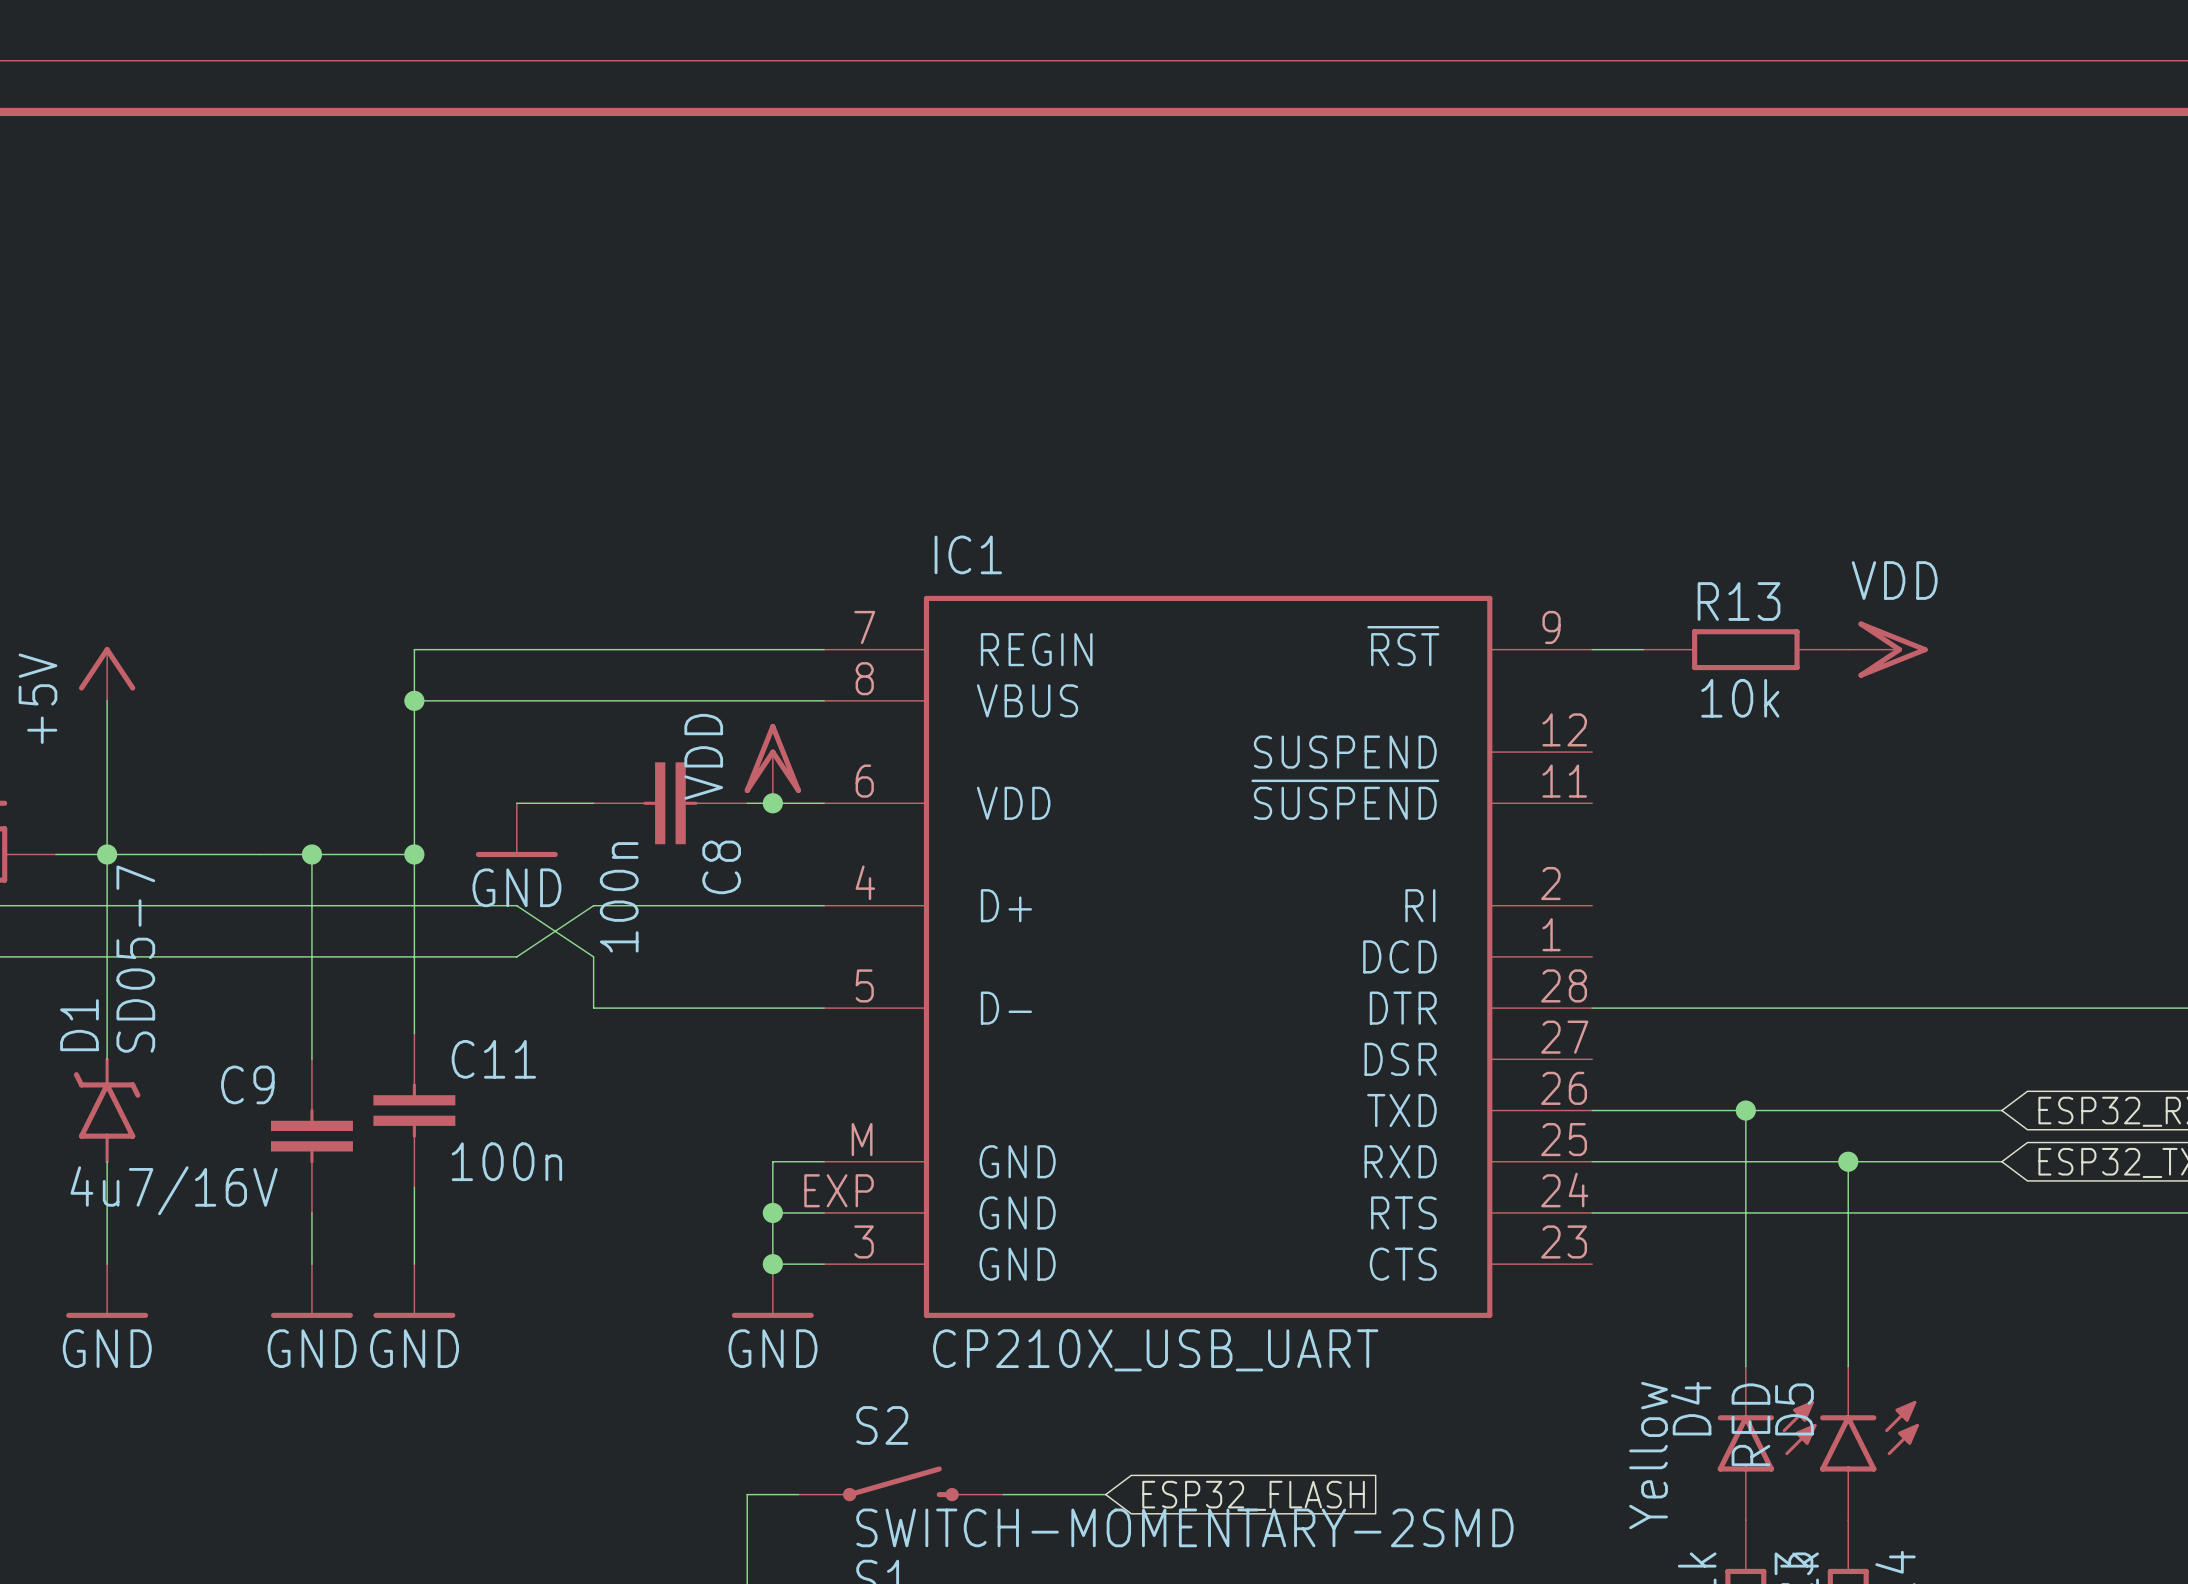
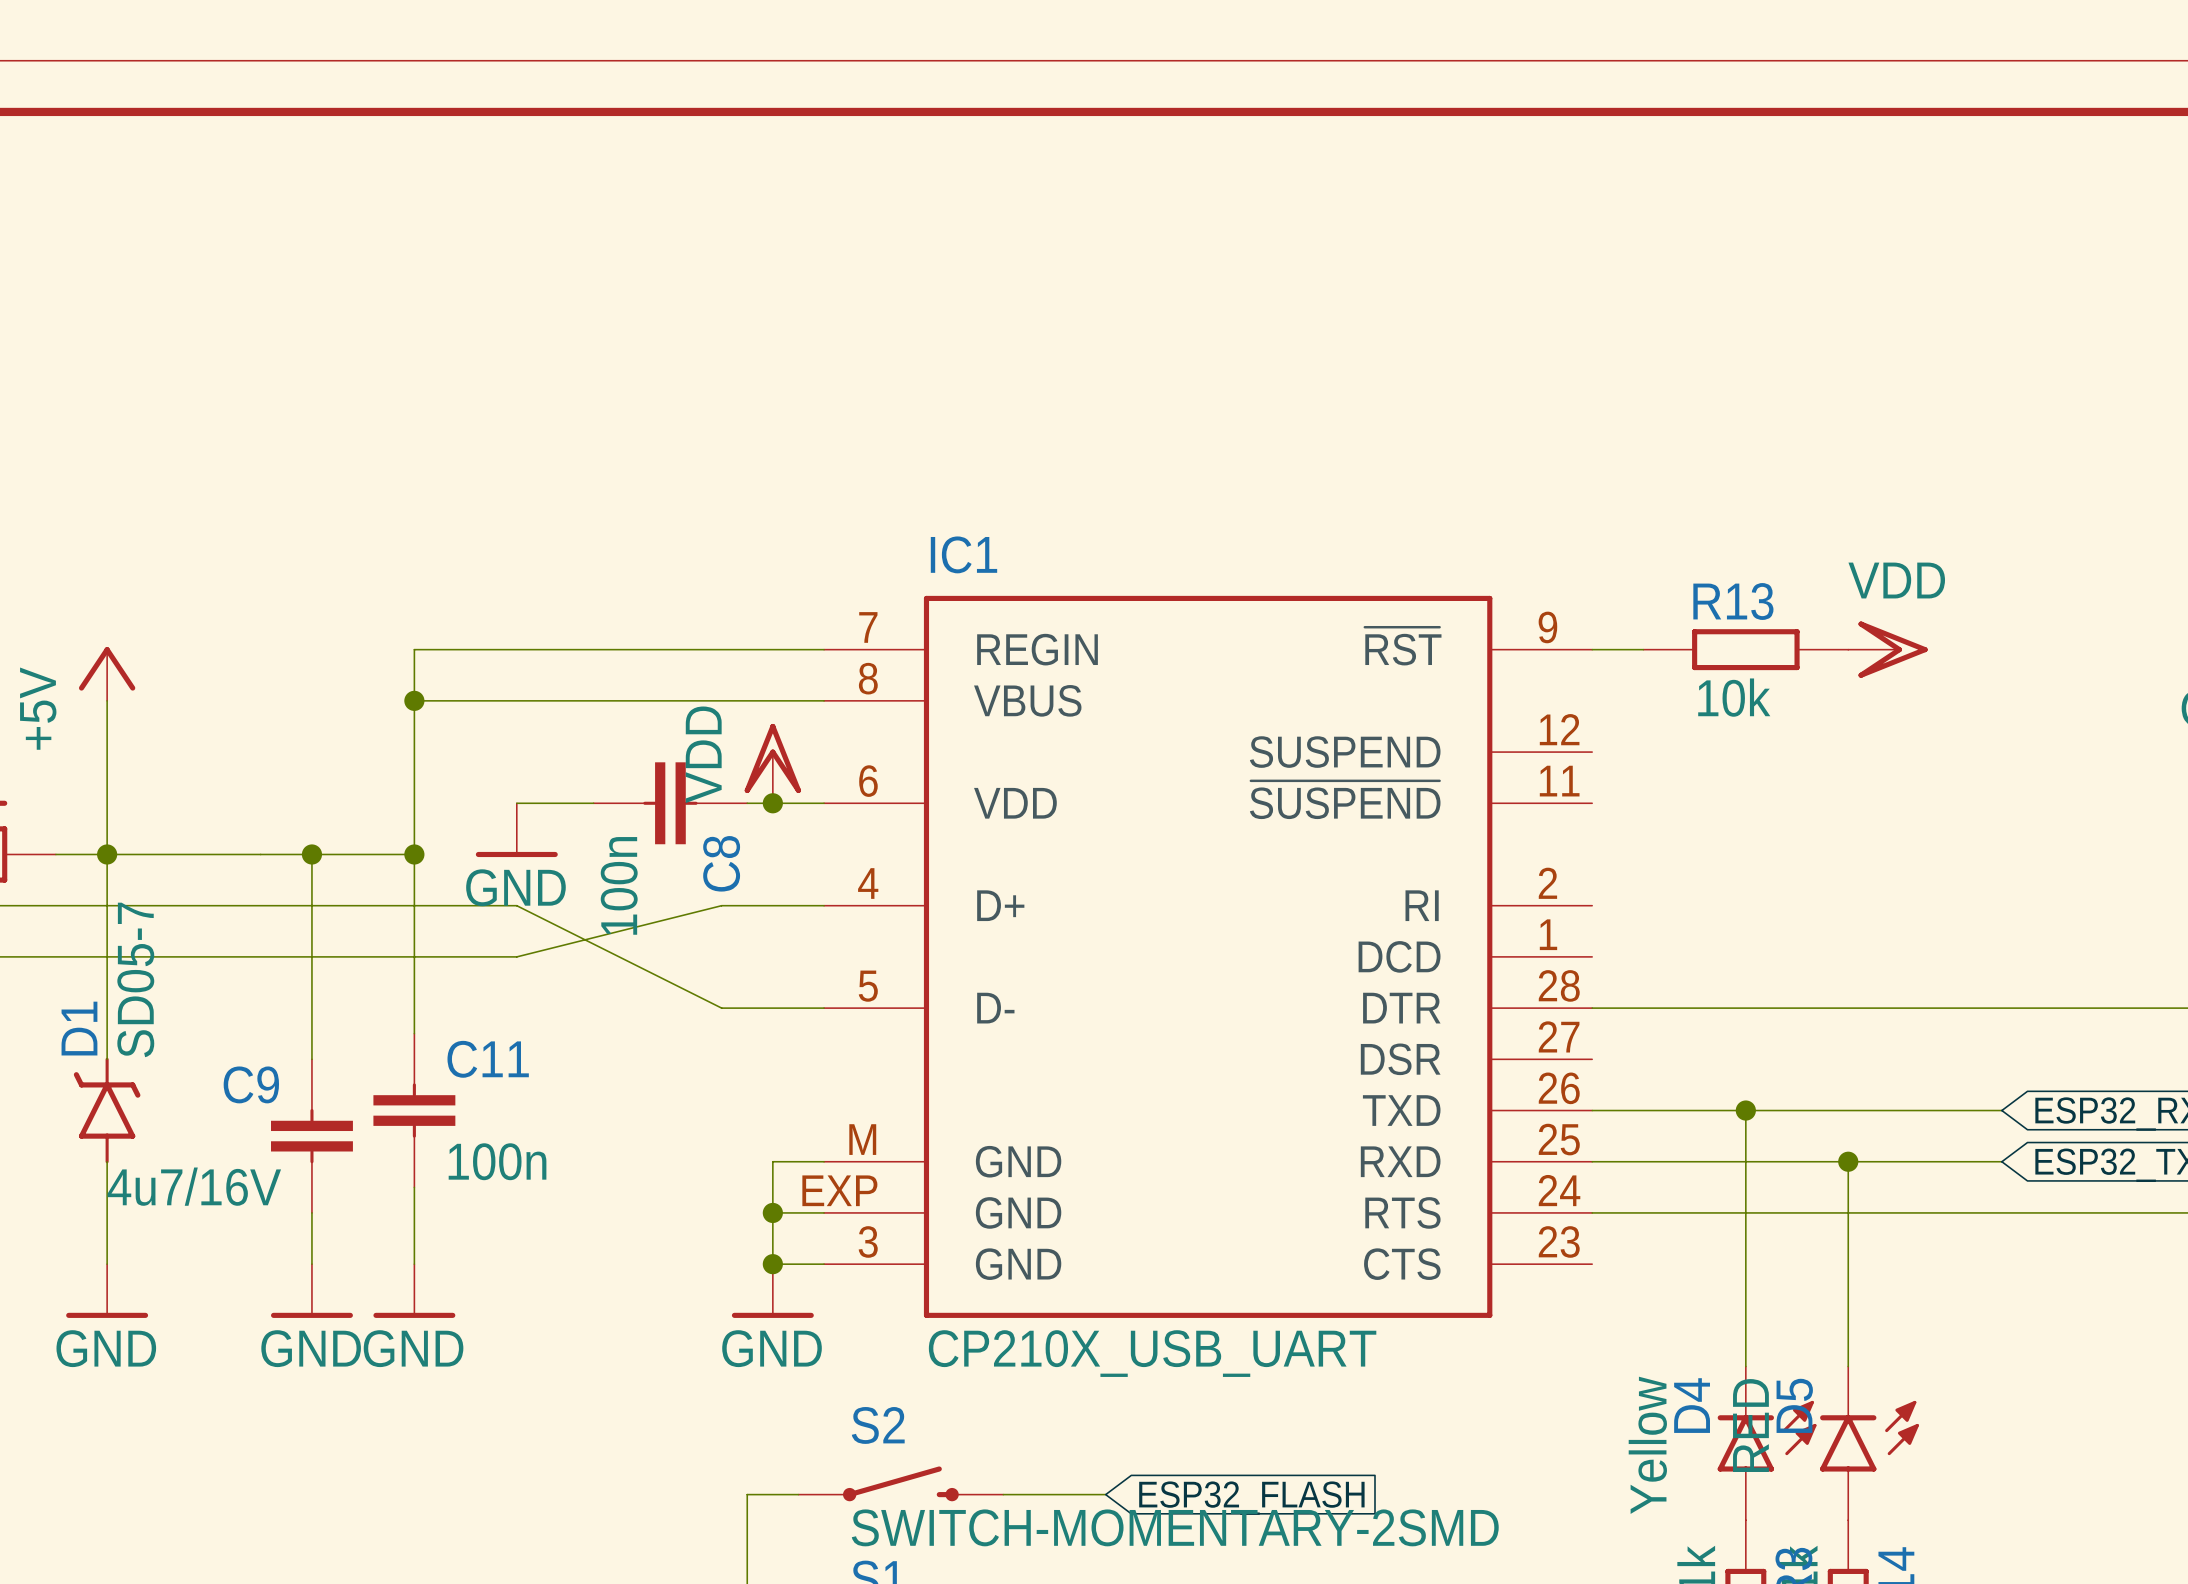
wire: (516, 905) (593, 956) (593, 1008) (721, 1008) -> (516, 905) (721, 1008)
wire: (721, 905) (593, 905) (516, 956) -> (721, 905) (516, 956)

